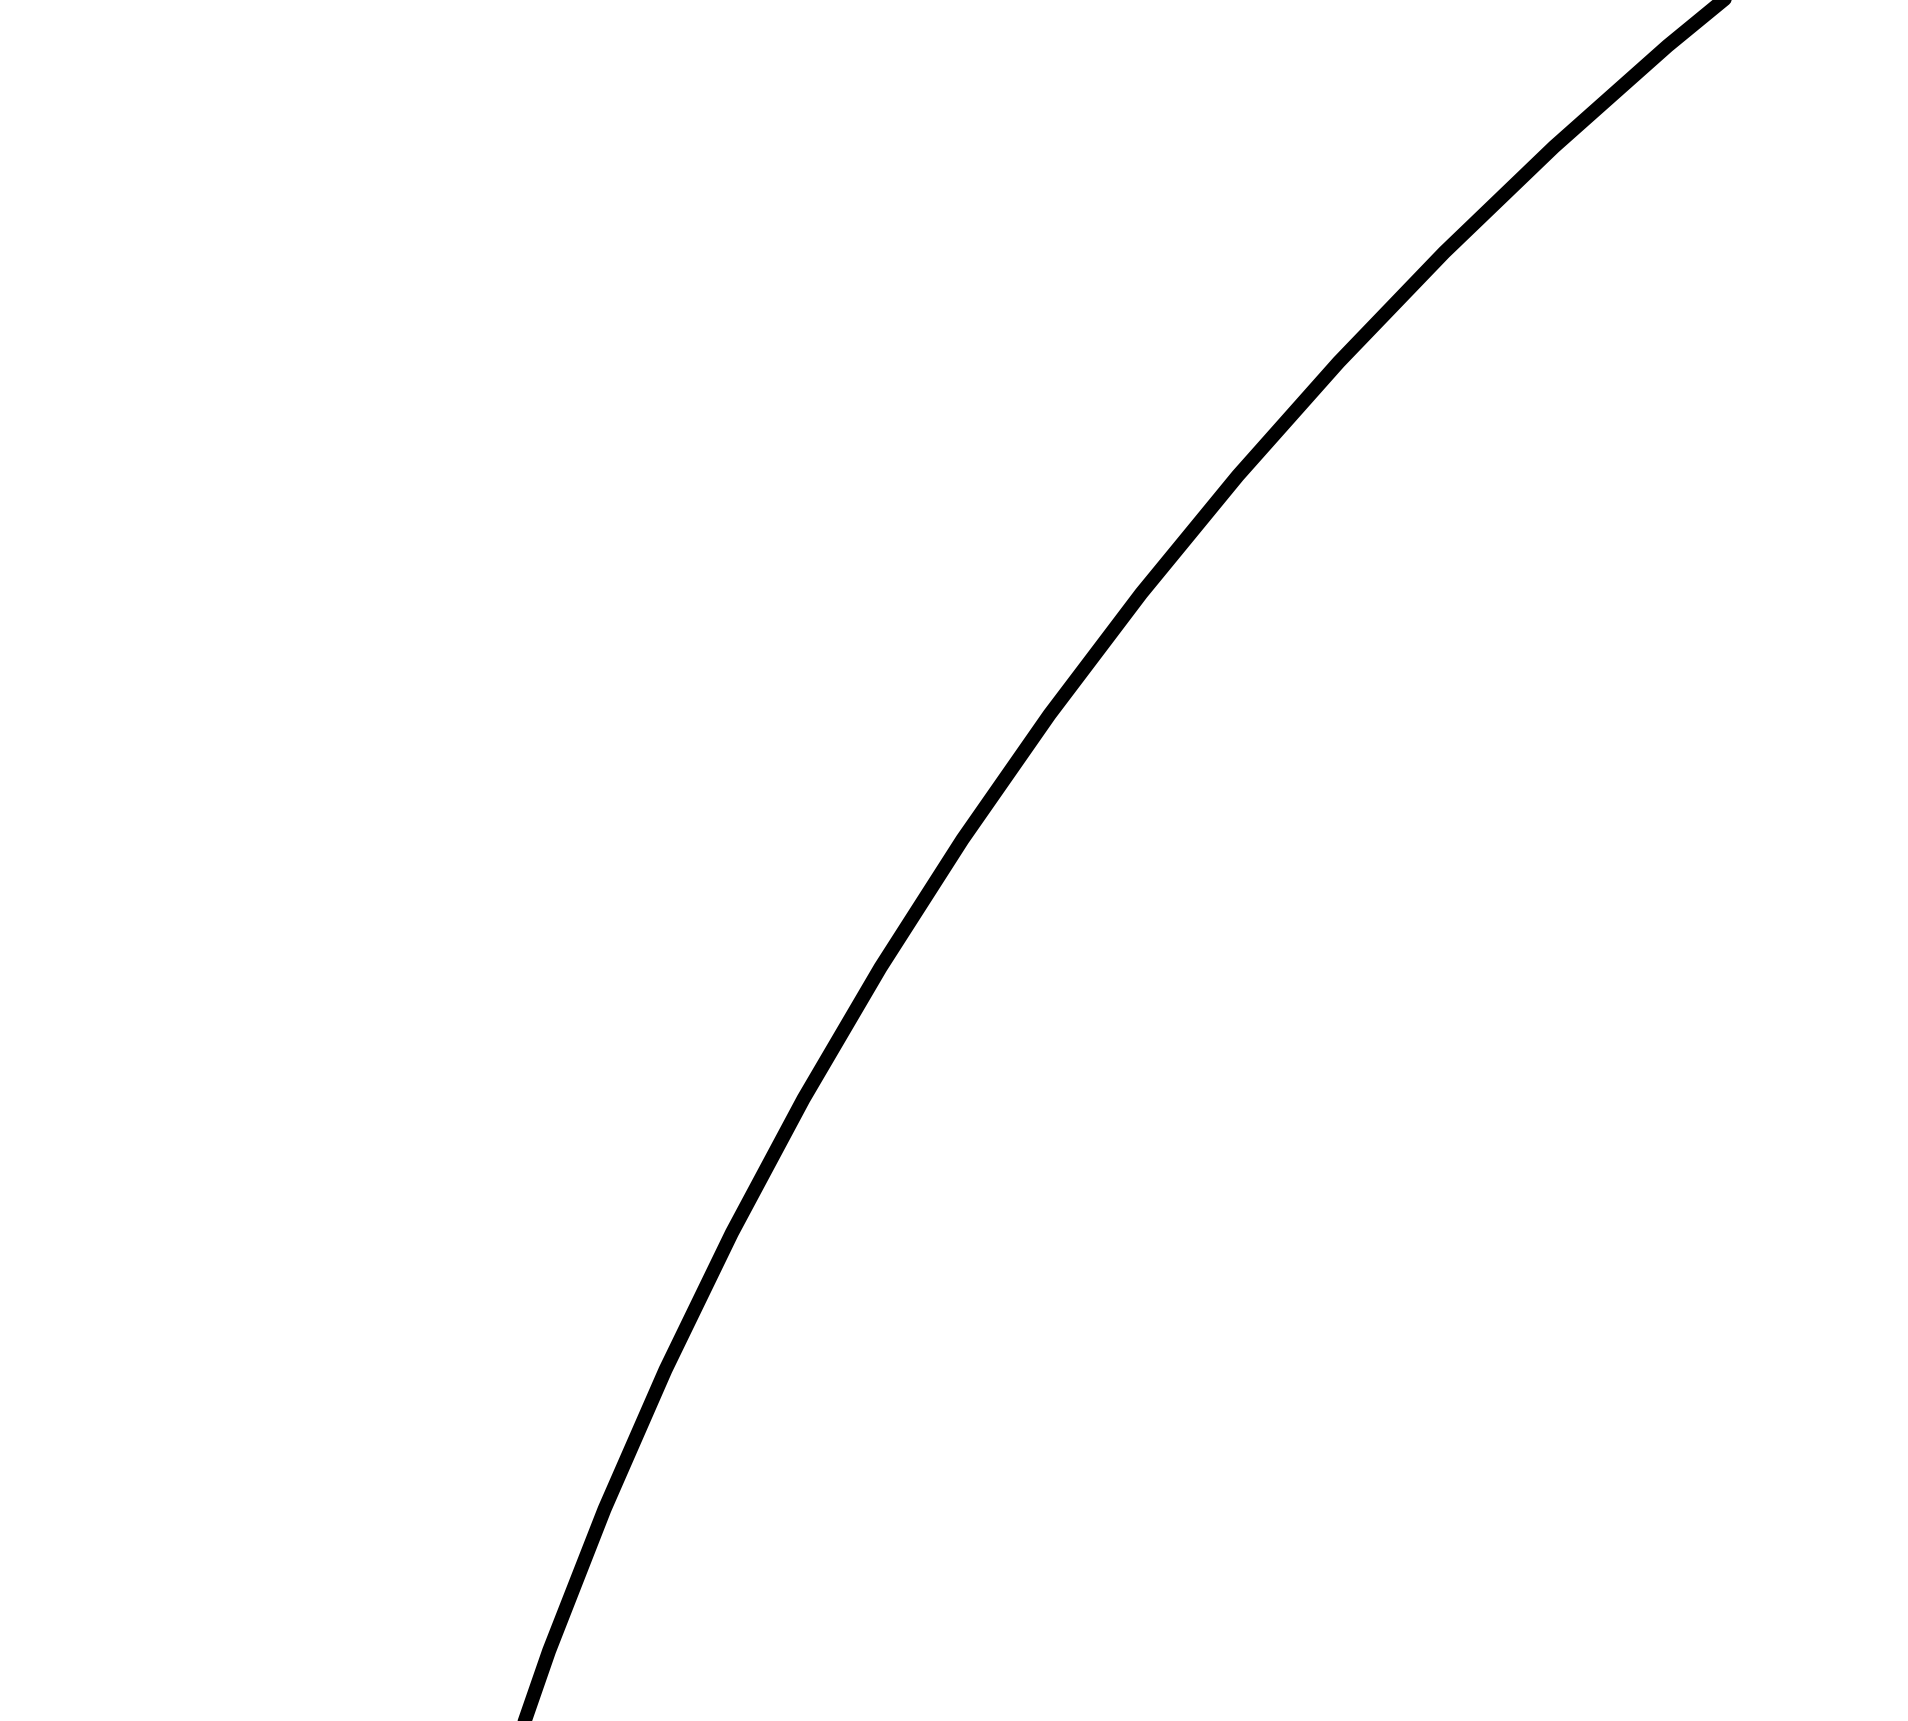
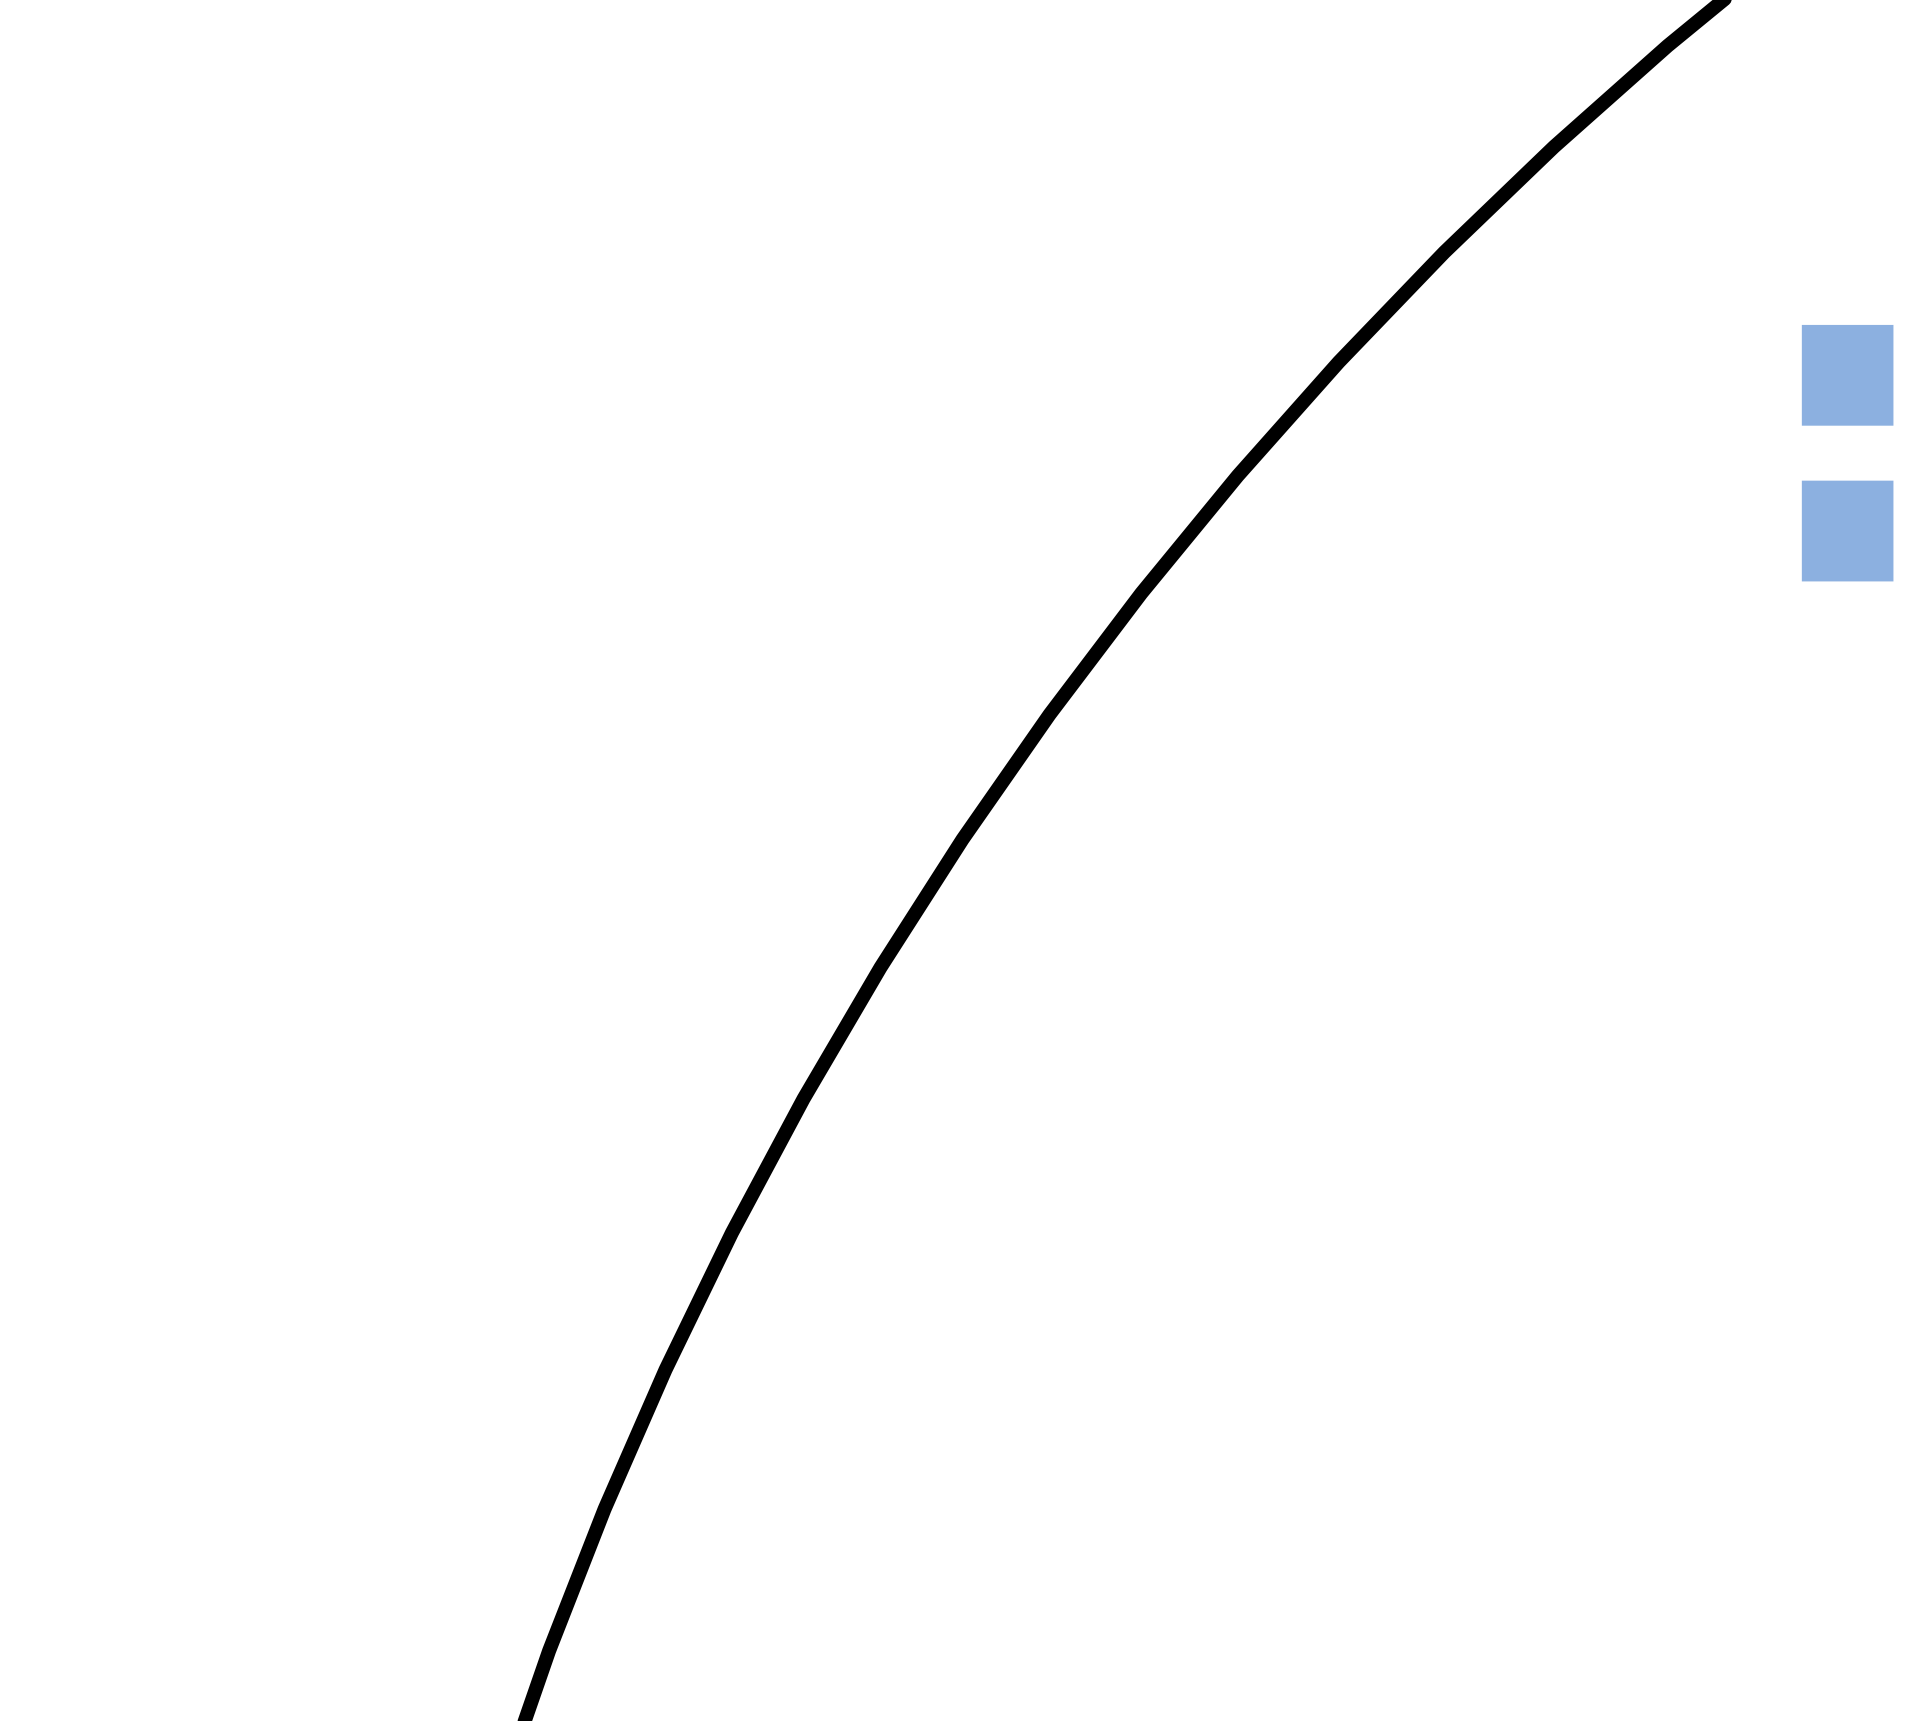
part: none -> (1847, 453)

